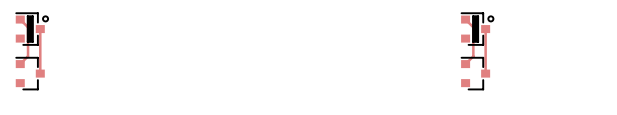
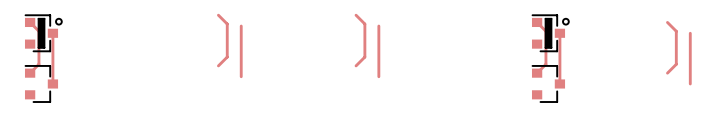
track: none -> (218, 15) (227, 24) (227, 57) (218, 65)
track: none -> (356, 15) (364, 24) (364, 57) (356, 65)
track: none -> (667, 22) (676, 31) (676, 64) (667, 73)
track: none -> (241, 26) (241, 76)
track: none -> (378, 26) (378, 76)
track: none -> (690, 33) (690, 83)

